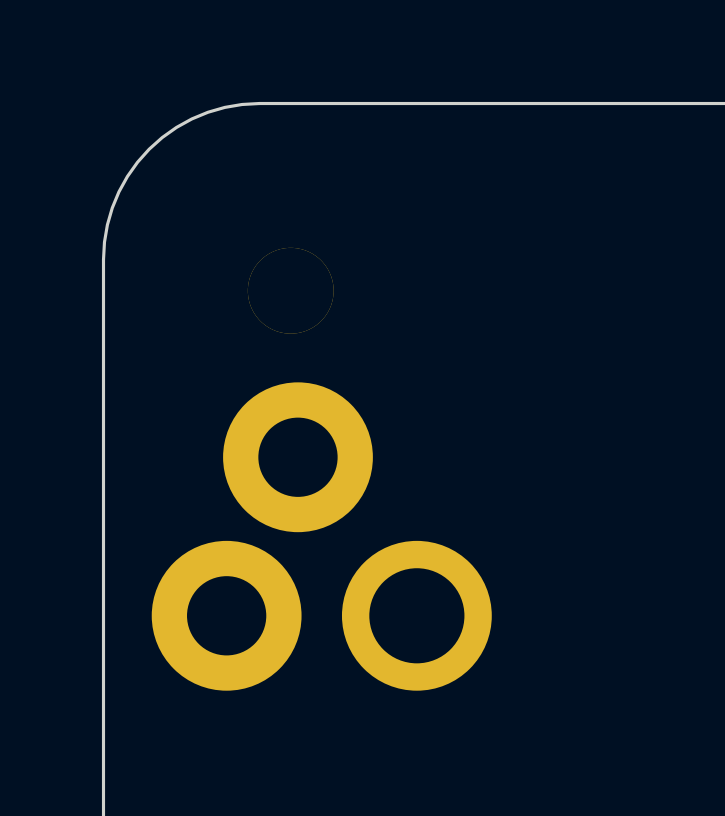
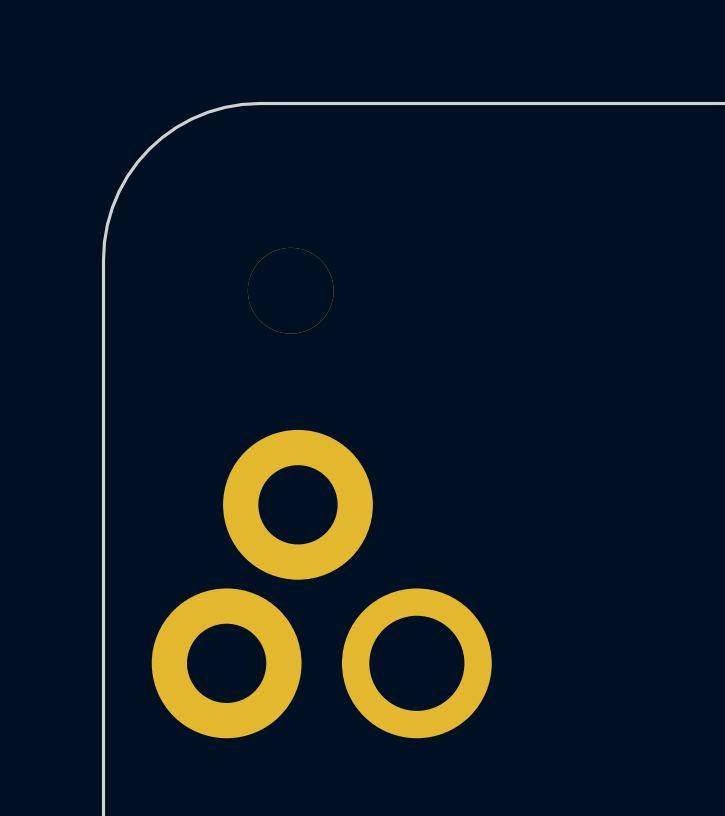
part position: (321, 536) -> (321, 584)

